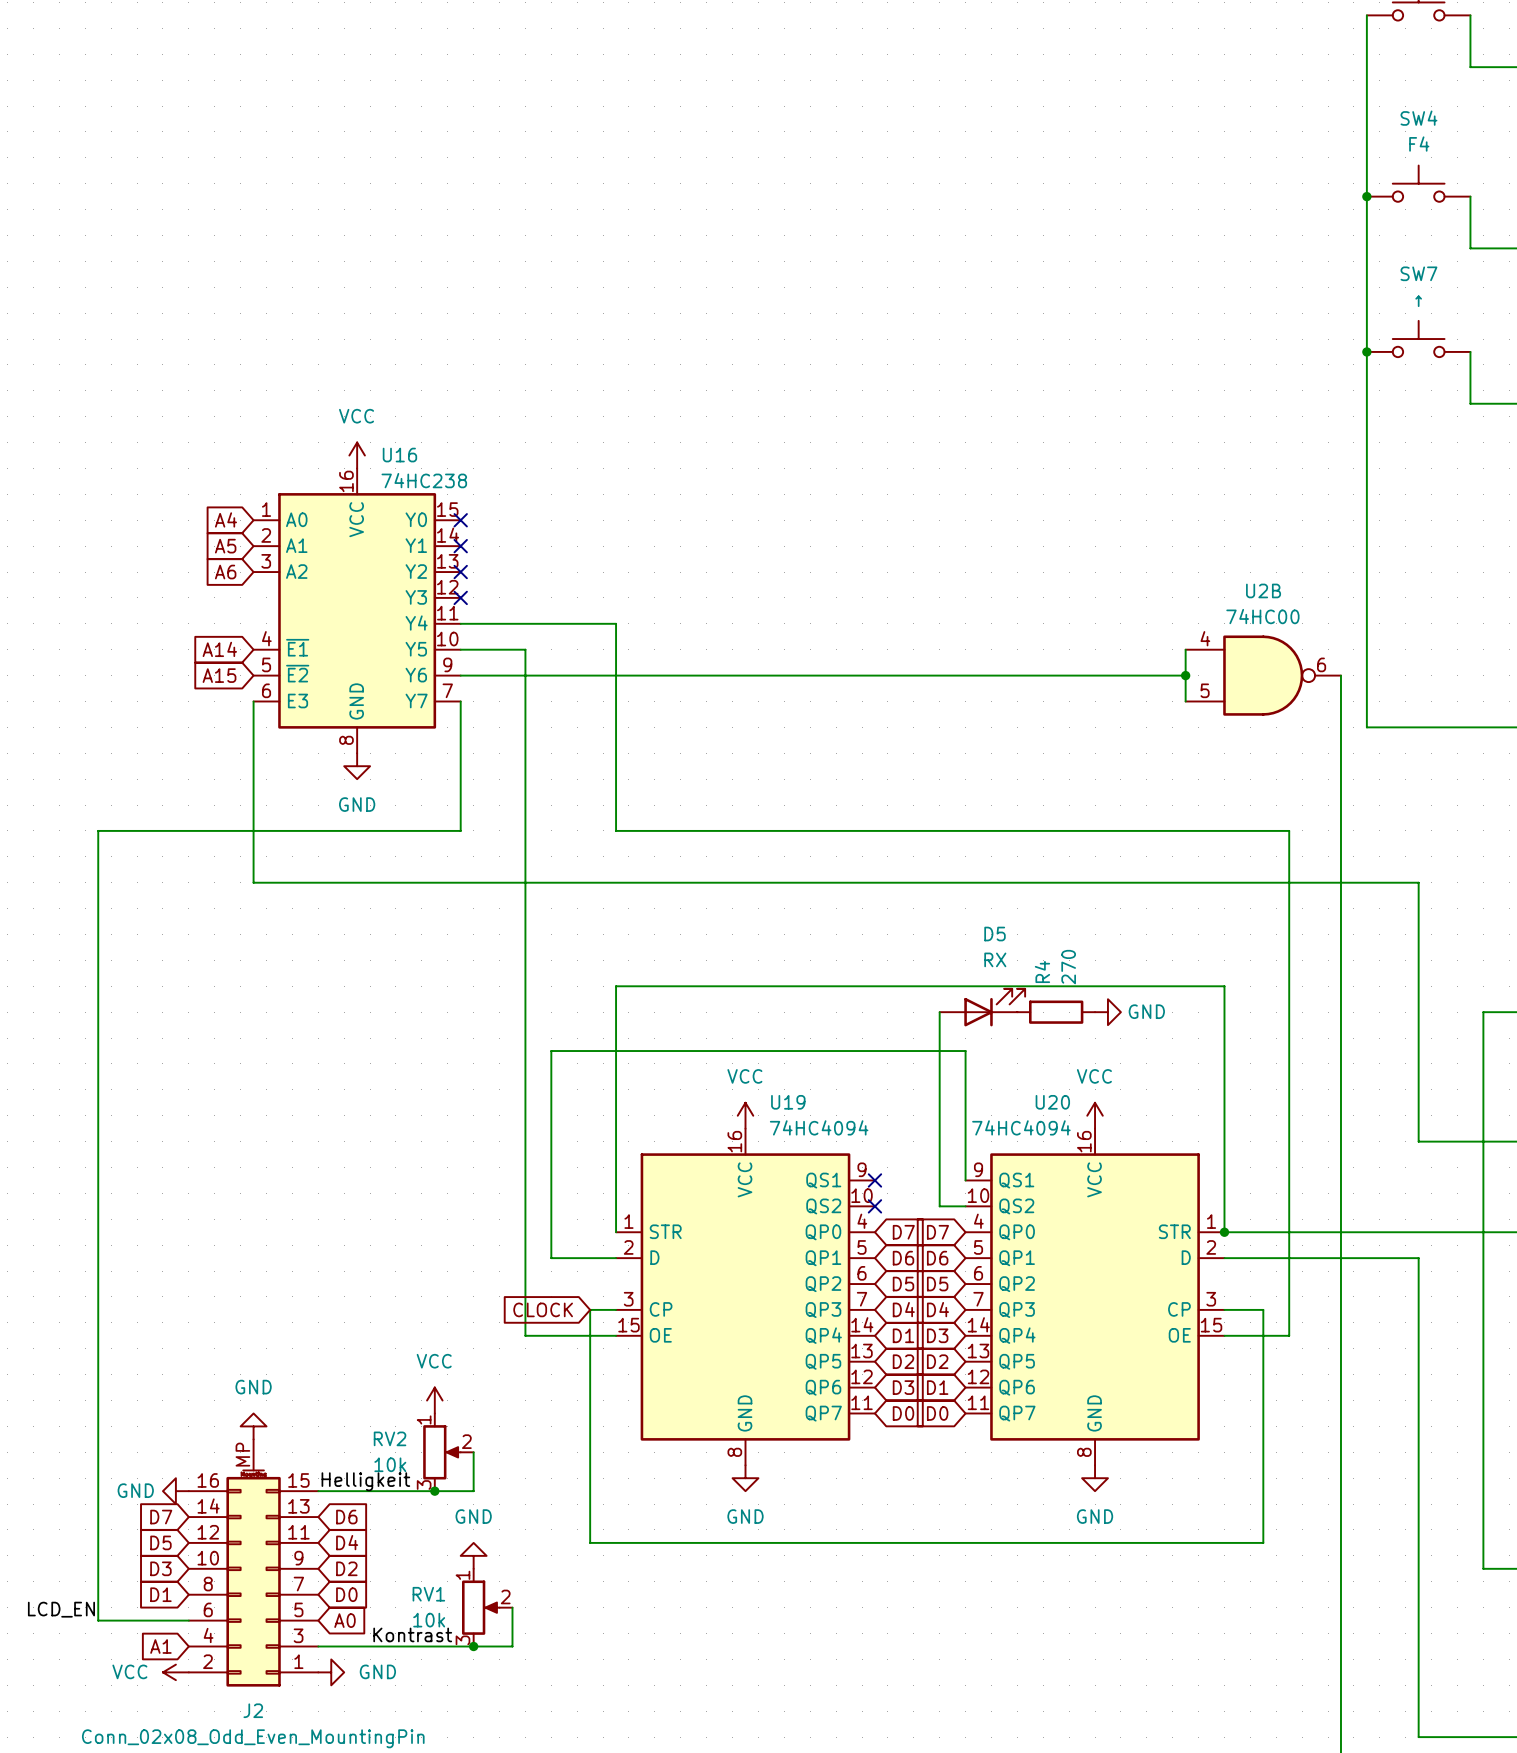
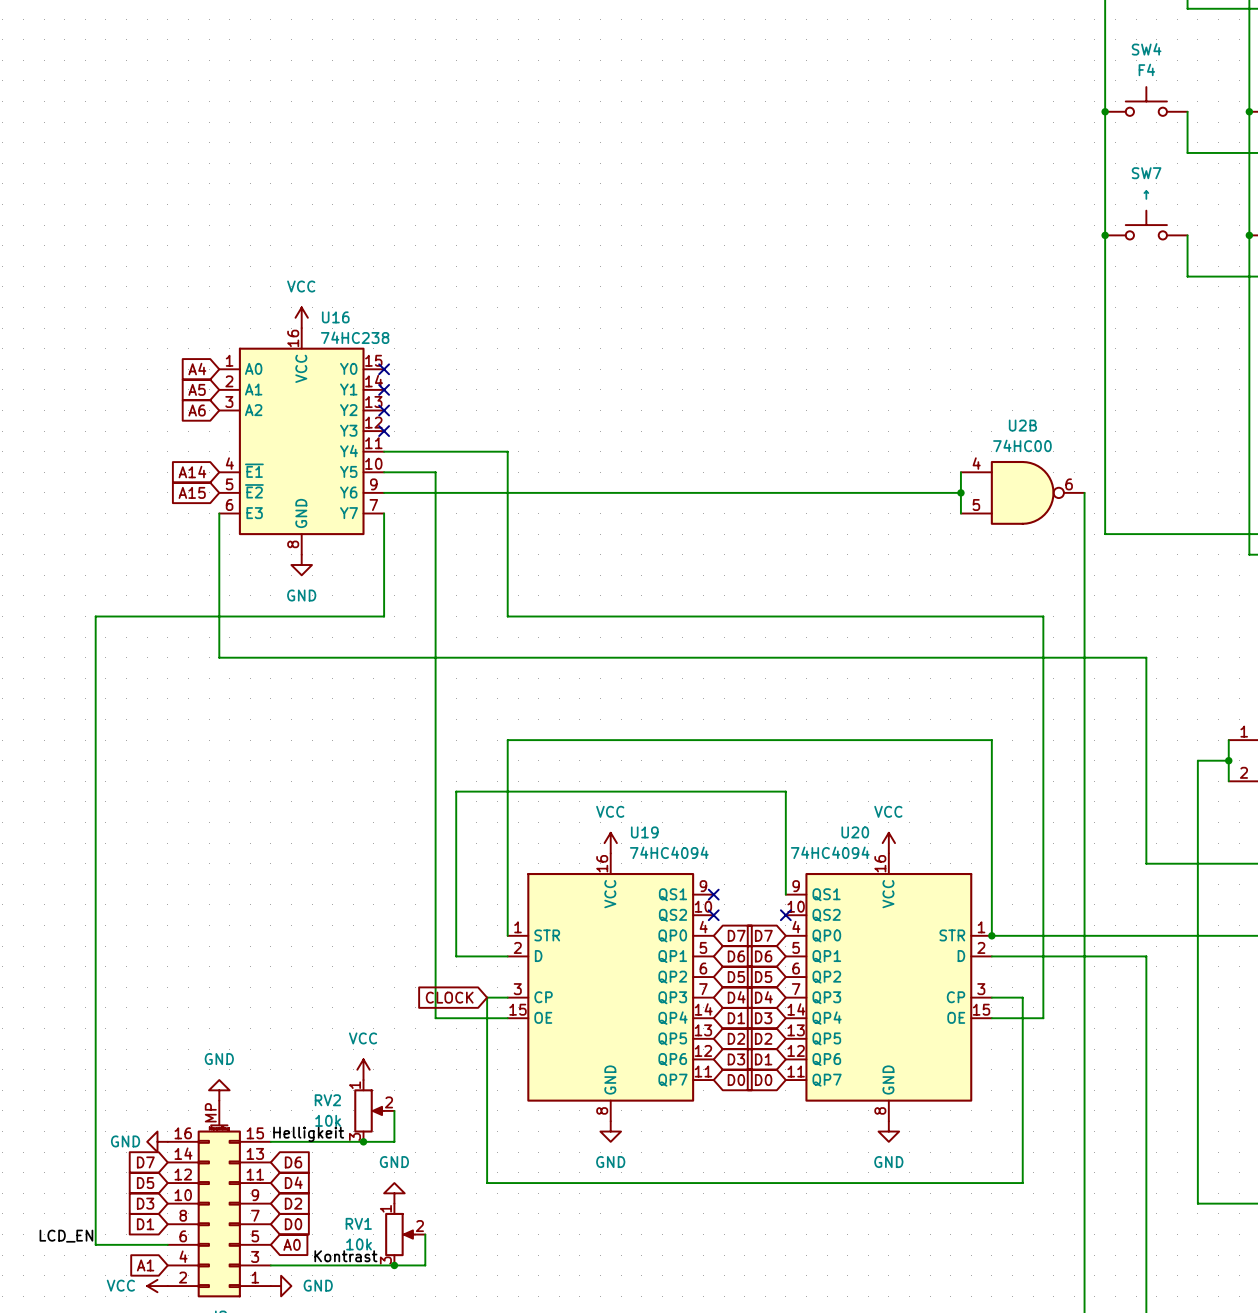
D5: RX (982, 1007) -> none
wire: (939, 1012) (939, 1206) (965, 1206) -> none
R4: 270 (1056, 1012) -> none
power symbol: GND (1107, 1012) -> none
no-connect mark: none -> (785, 915)

